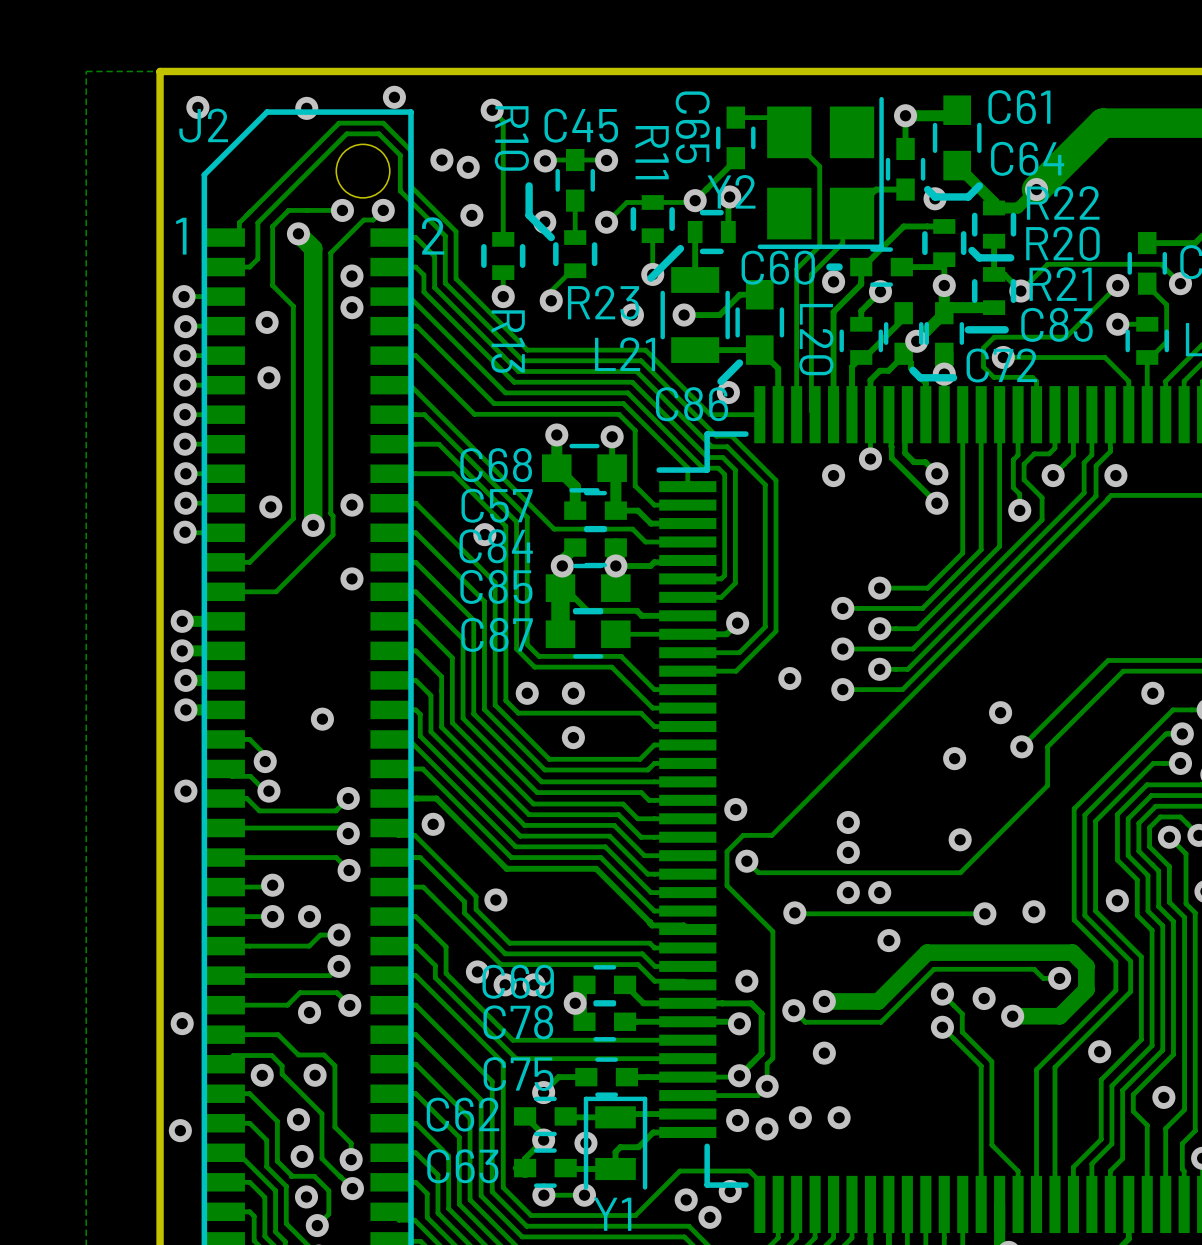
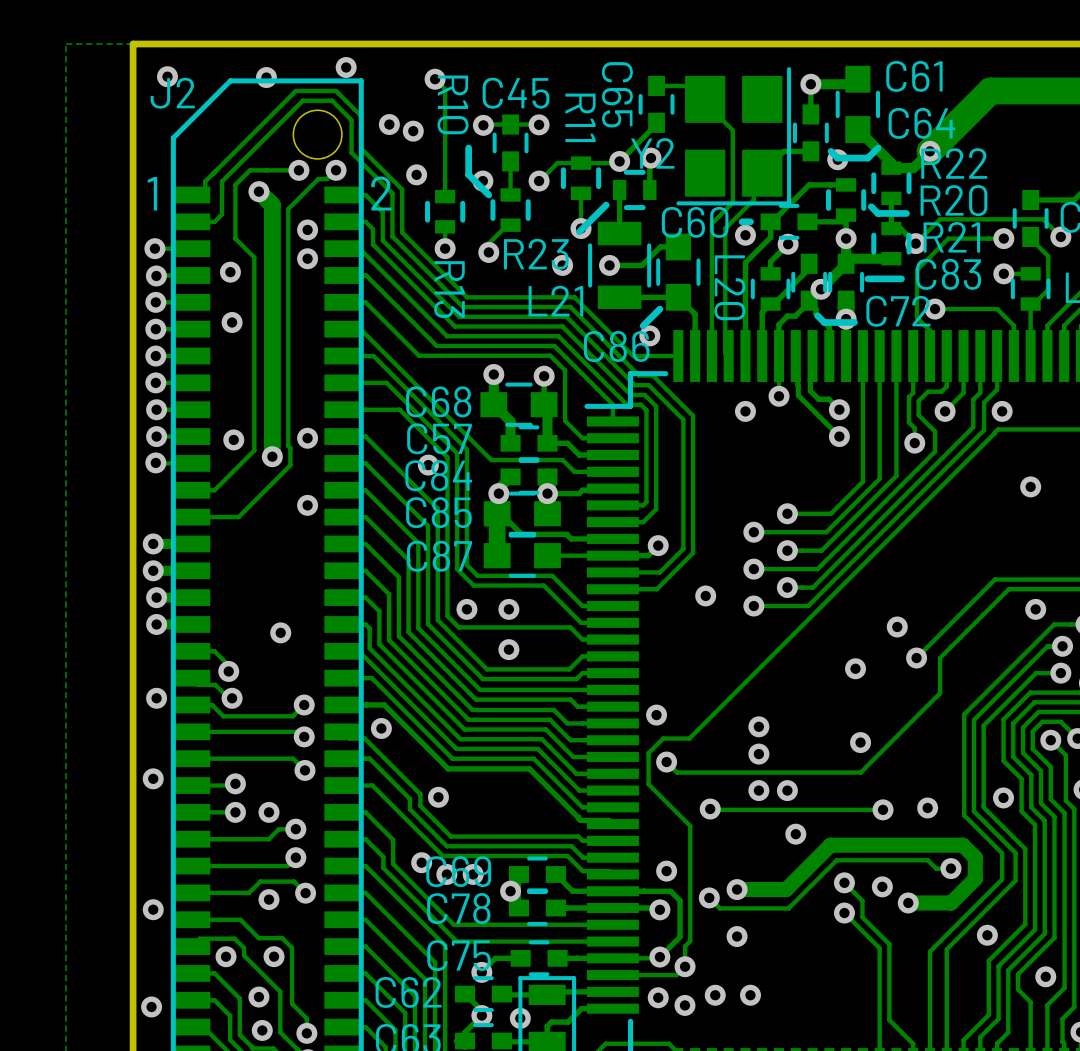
track: (1117, 285) (1066, 337) (994, 337) (983, 347) (983, 367) (993, 377) (1032, 377) (1036, 381) (1036, 386) -> (1003, 238) (948, 238) (917, 270) (917, 317) (929, 330)
track: (1003, 357) (1104, 357) (1110, 363) -> (935, 309) (997, 309)
via position: (1003, 357) -> (935, 309)
via: none -> (1030, 486)
via: none -> (153, 778)

